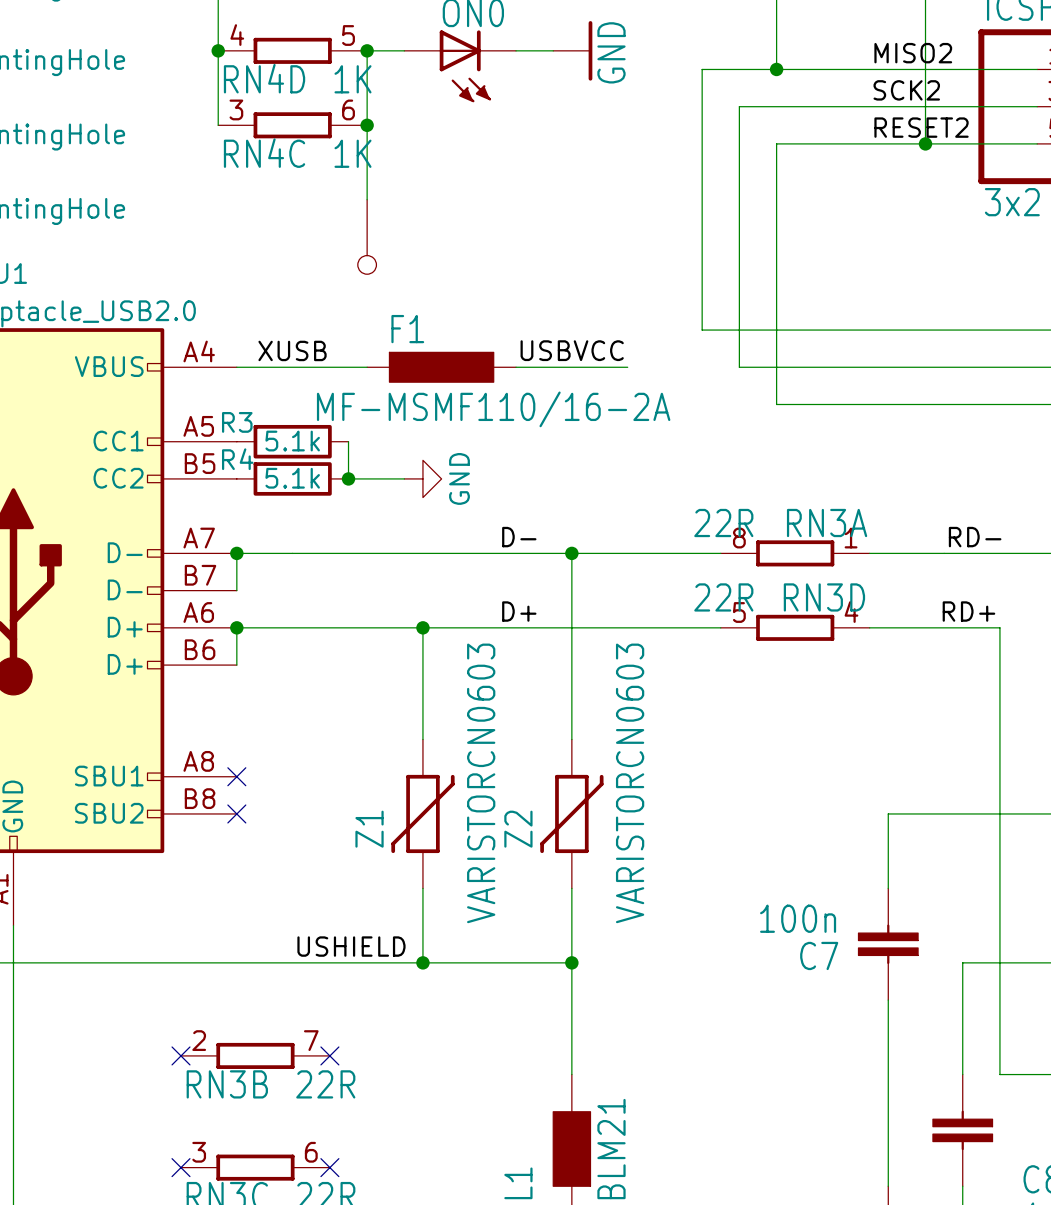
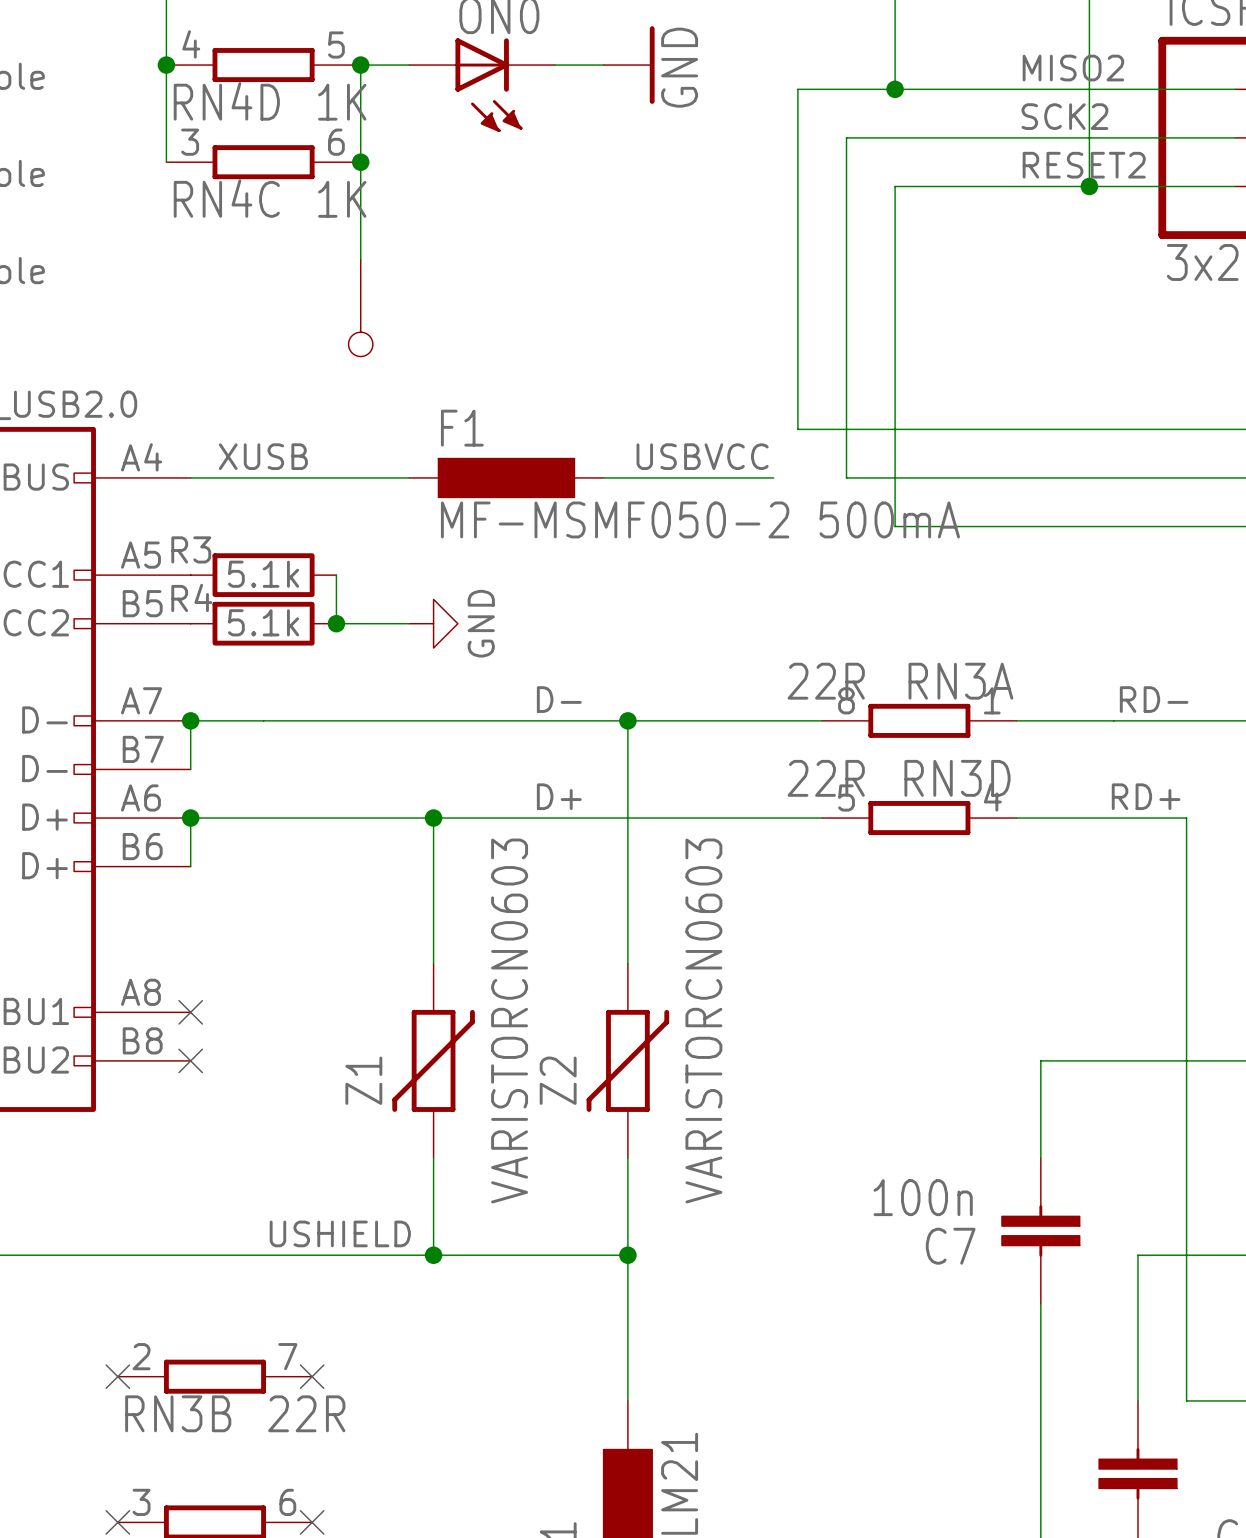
label position: USBVCC (572, 350) -> USBVCC (702, 456)
F1 position: (441, 367) -> (506, 477)
wire: none -> (700, 477) (773, 477)
F1 value: MF-MSMF110/16-2A (493, 409) -> MF-MSMF050-2 500mA (700, 519)

